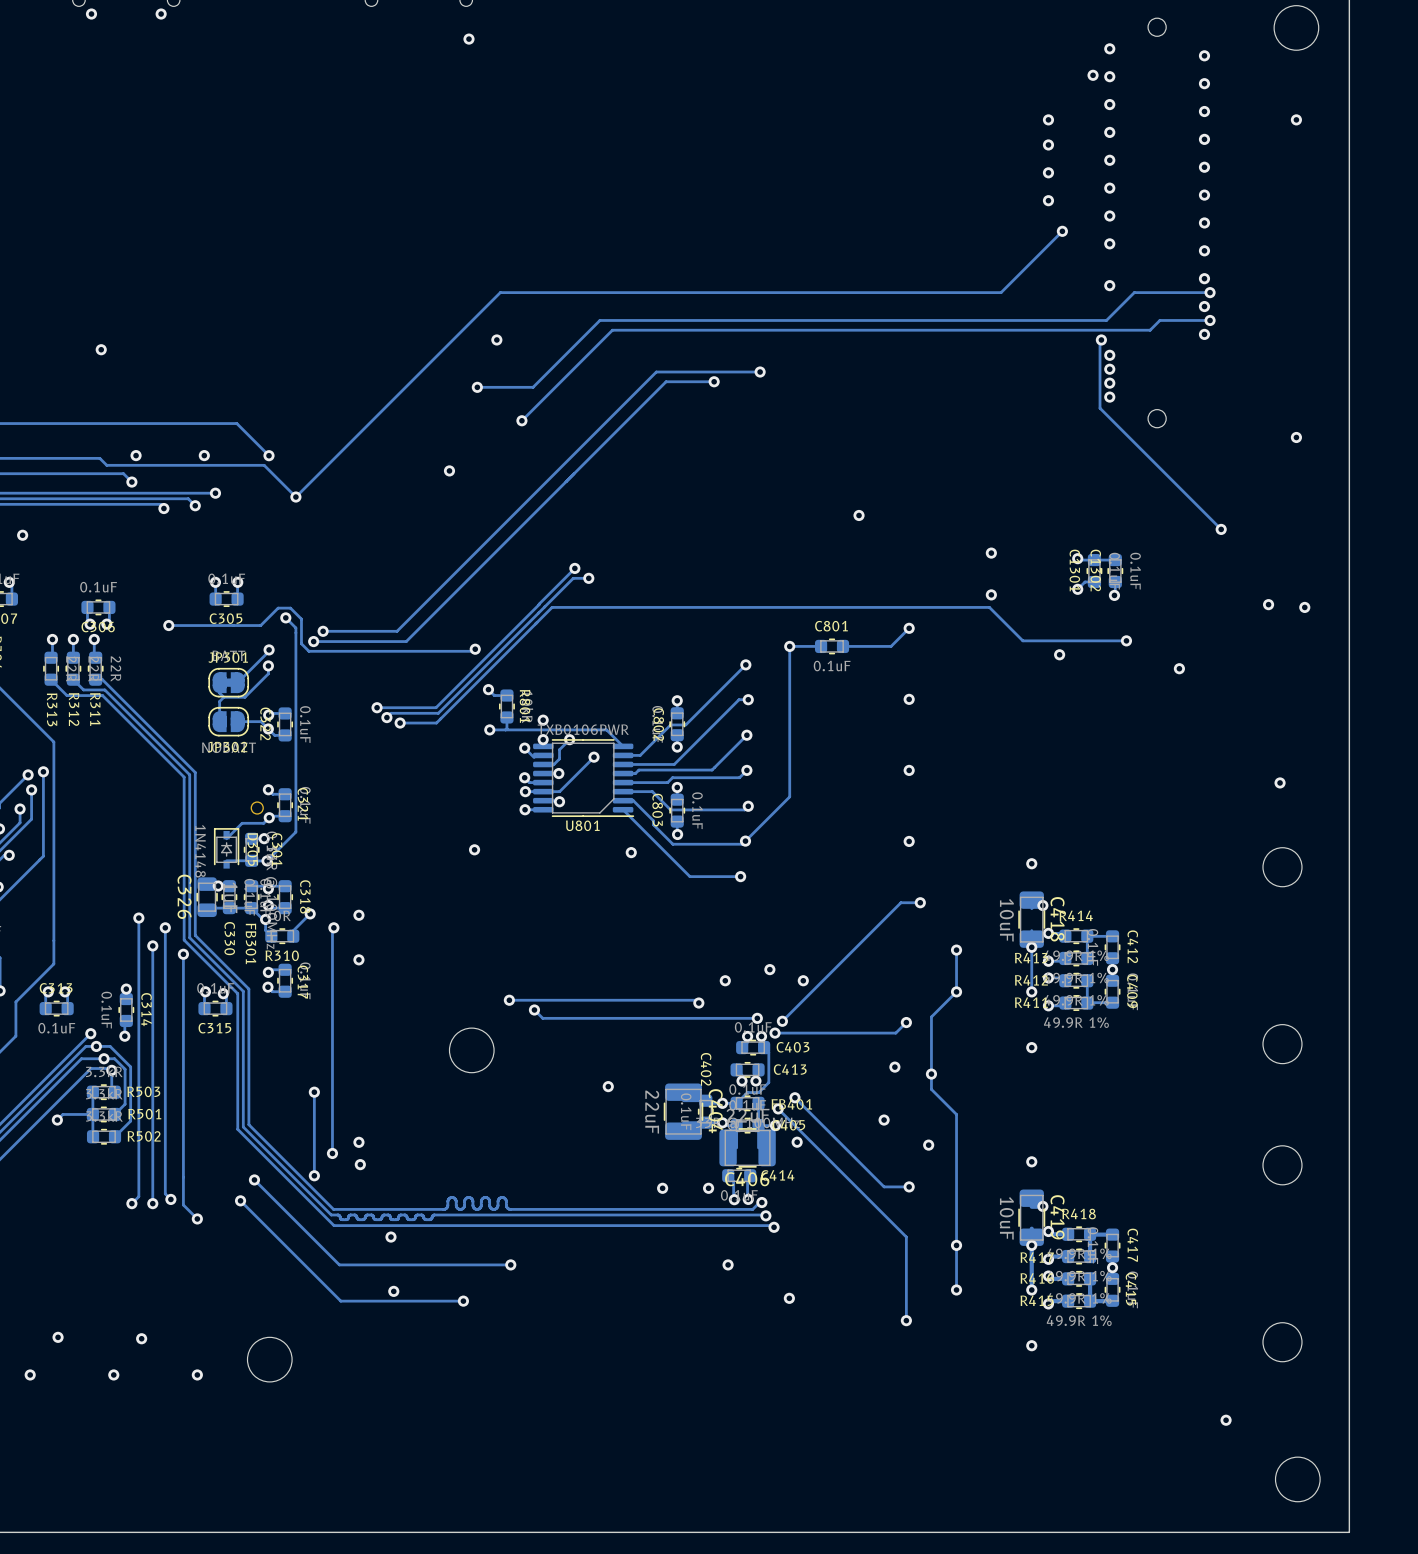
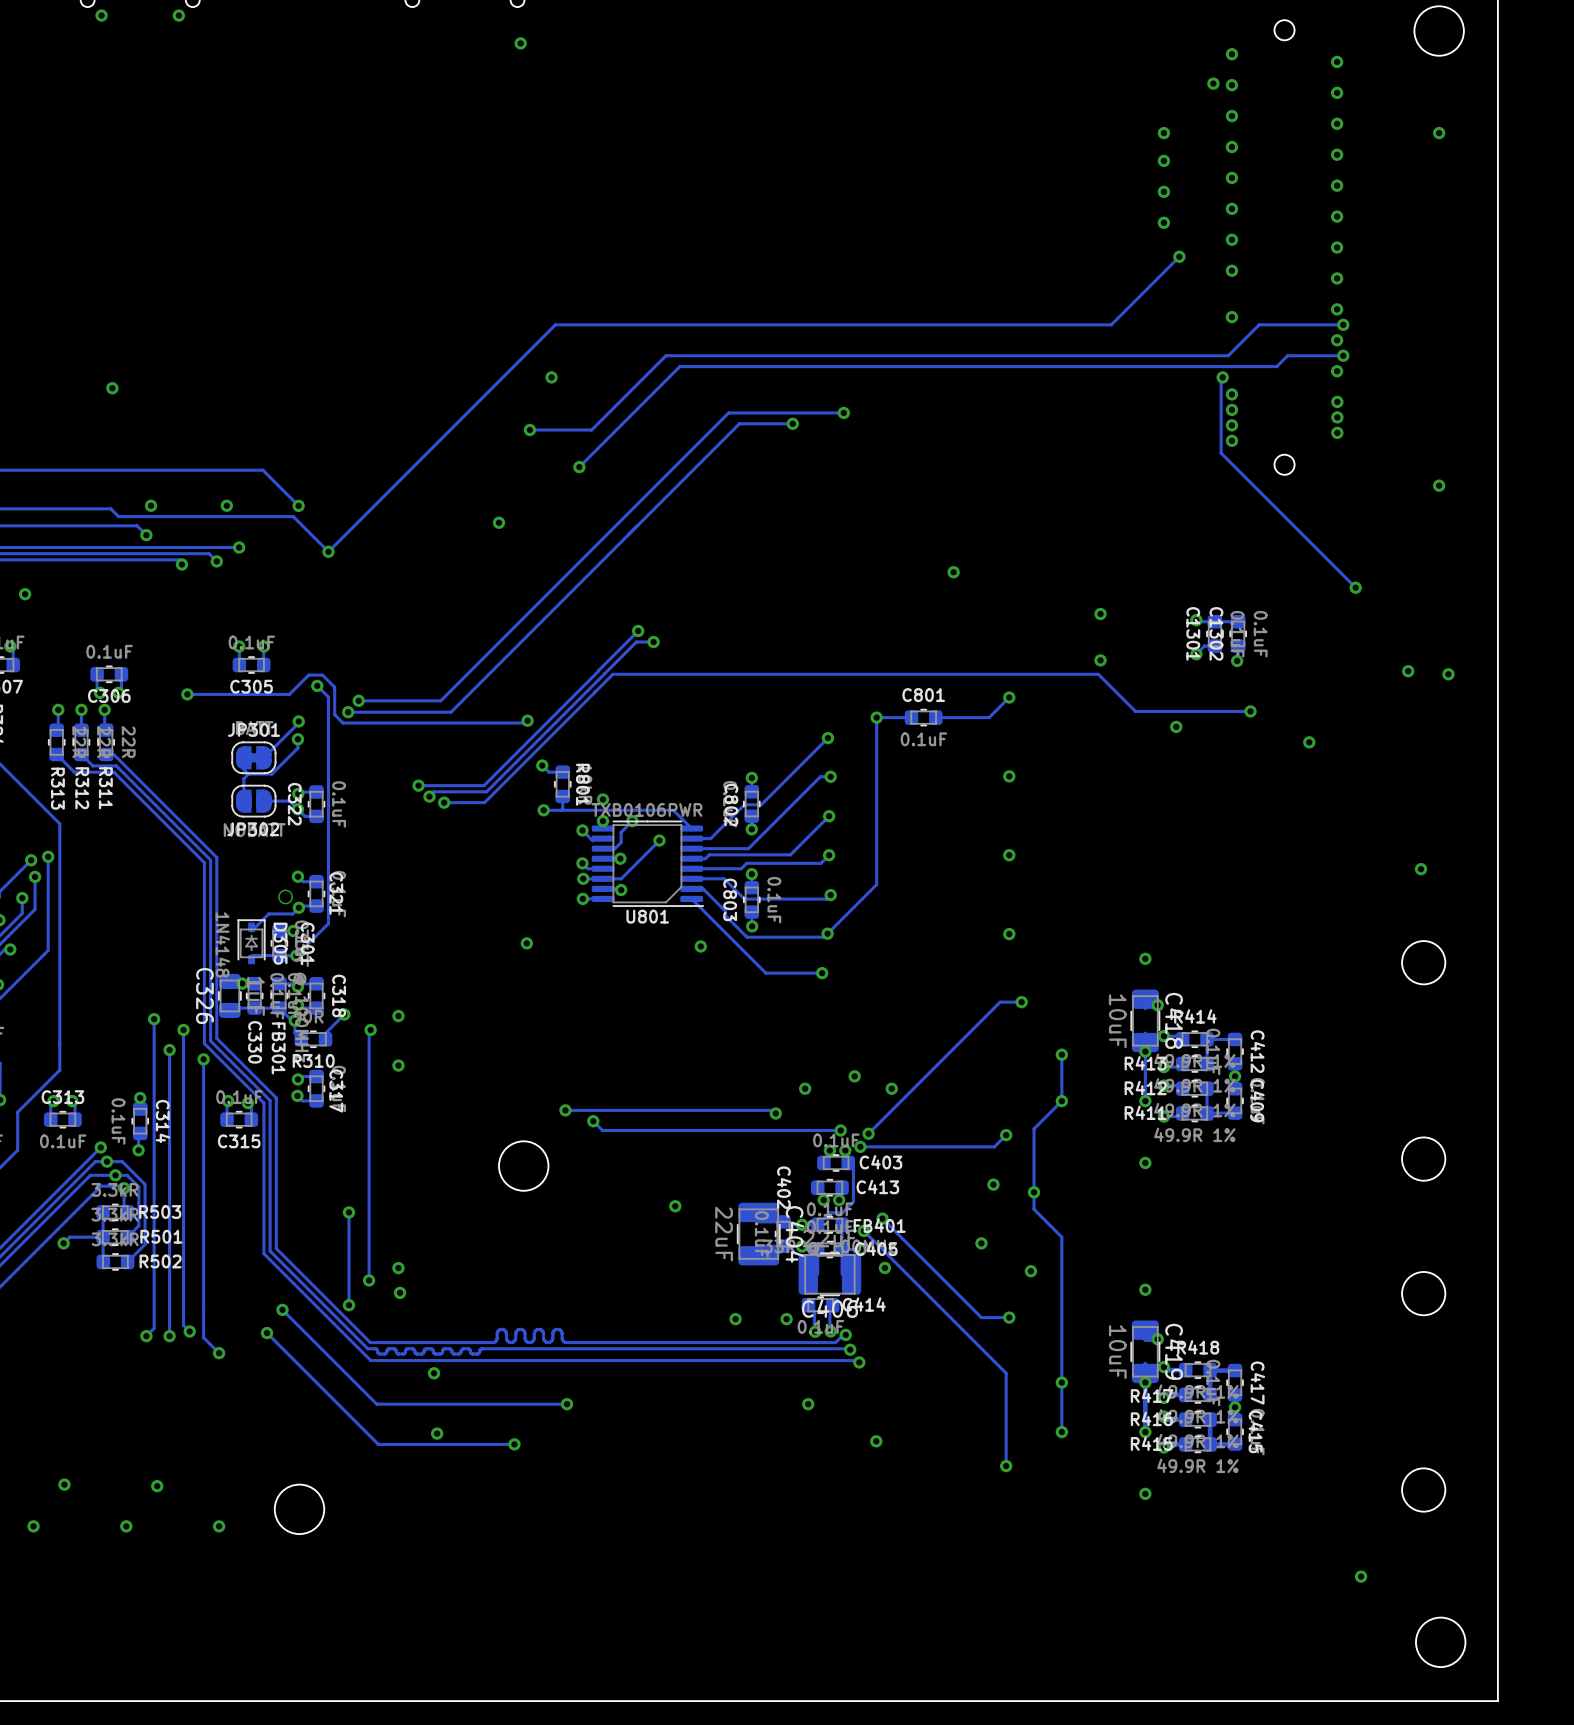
via: none -> (1337, 401)
via: none -> (1337, 417)
via: none -> (1337, 432)

